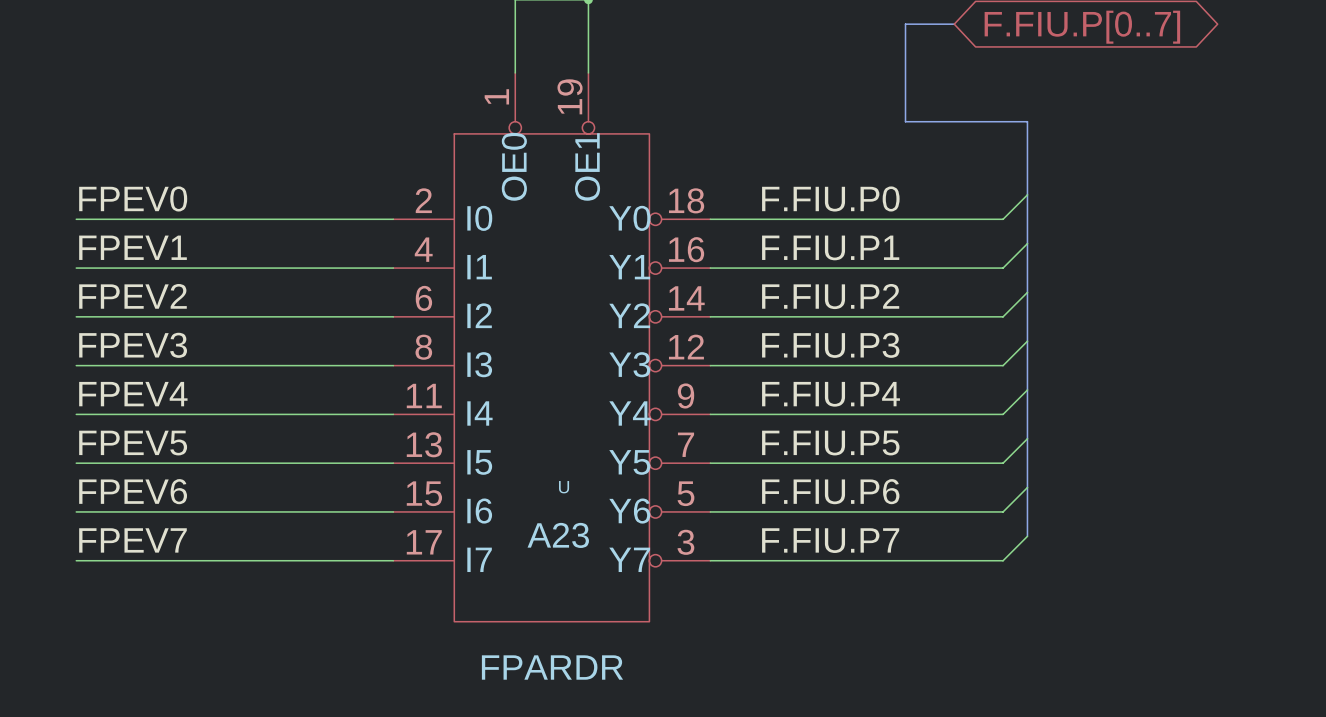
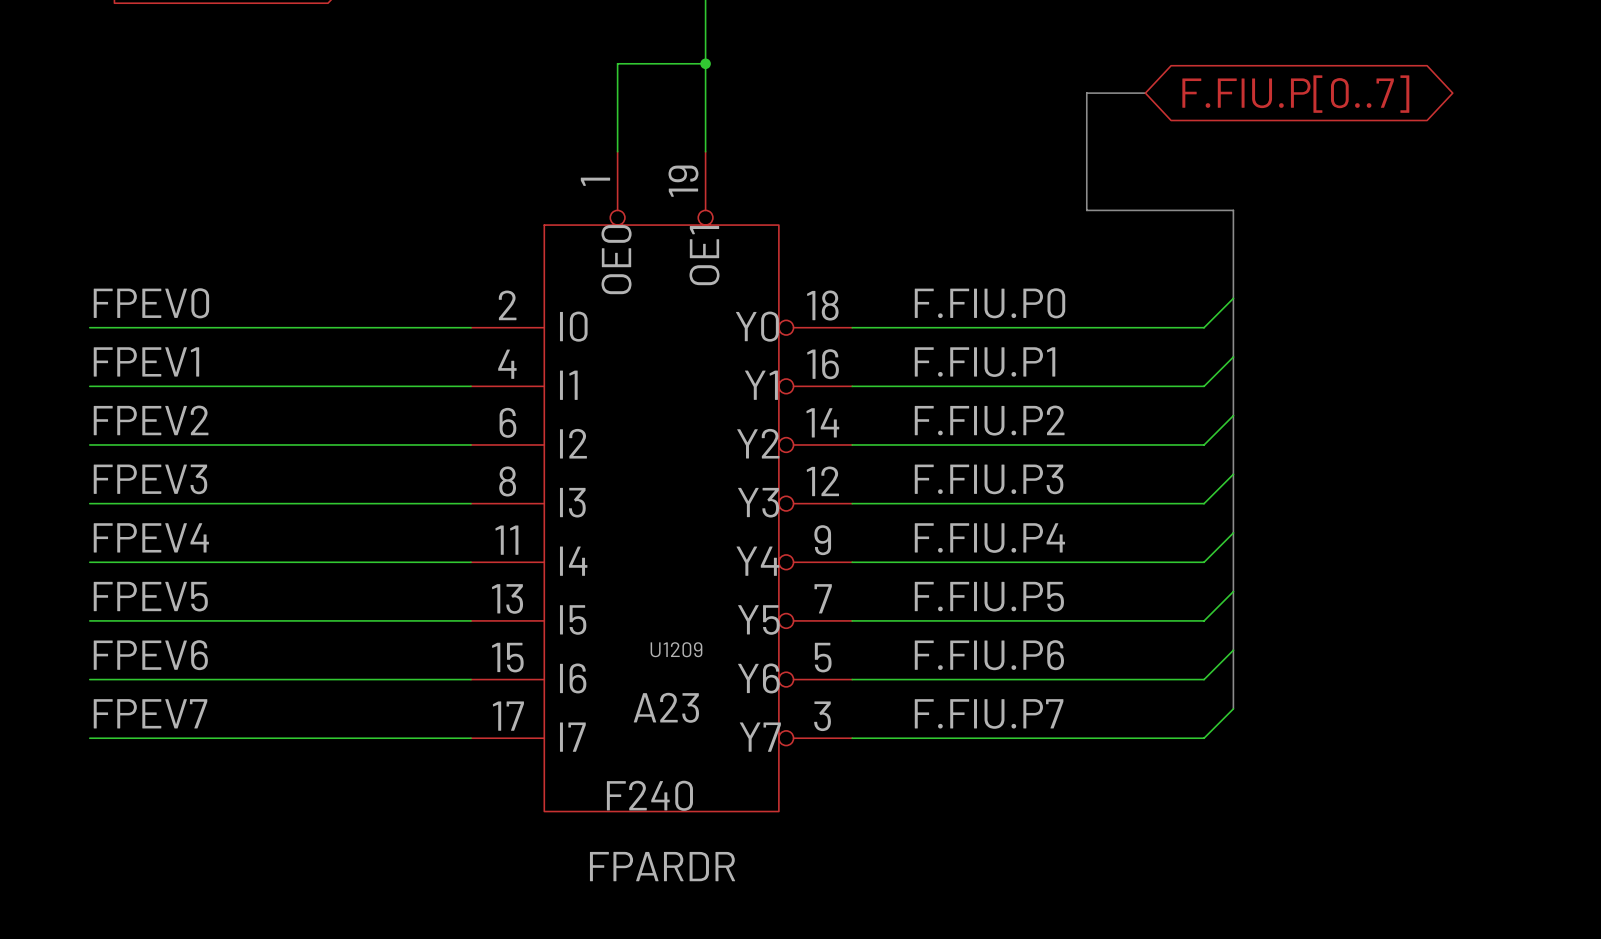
U name: U (564, 487) -> U1209 (676, 649)
U value: none -> F240 (649, 795)

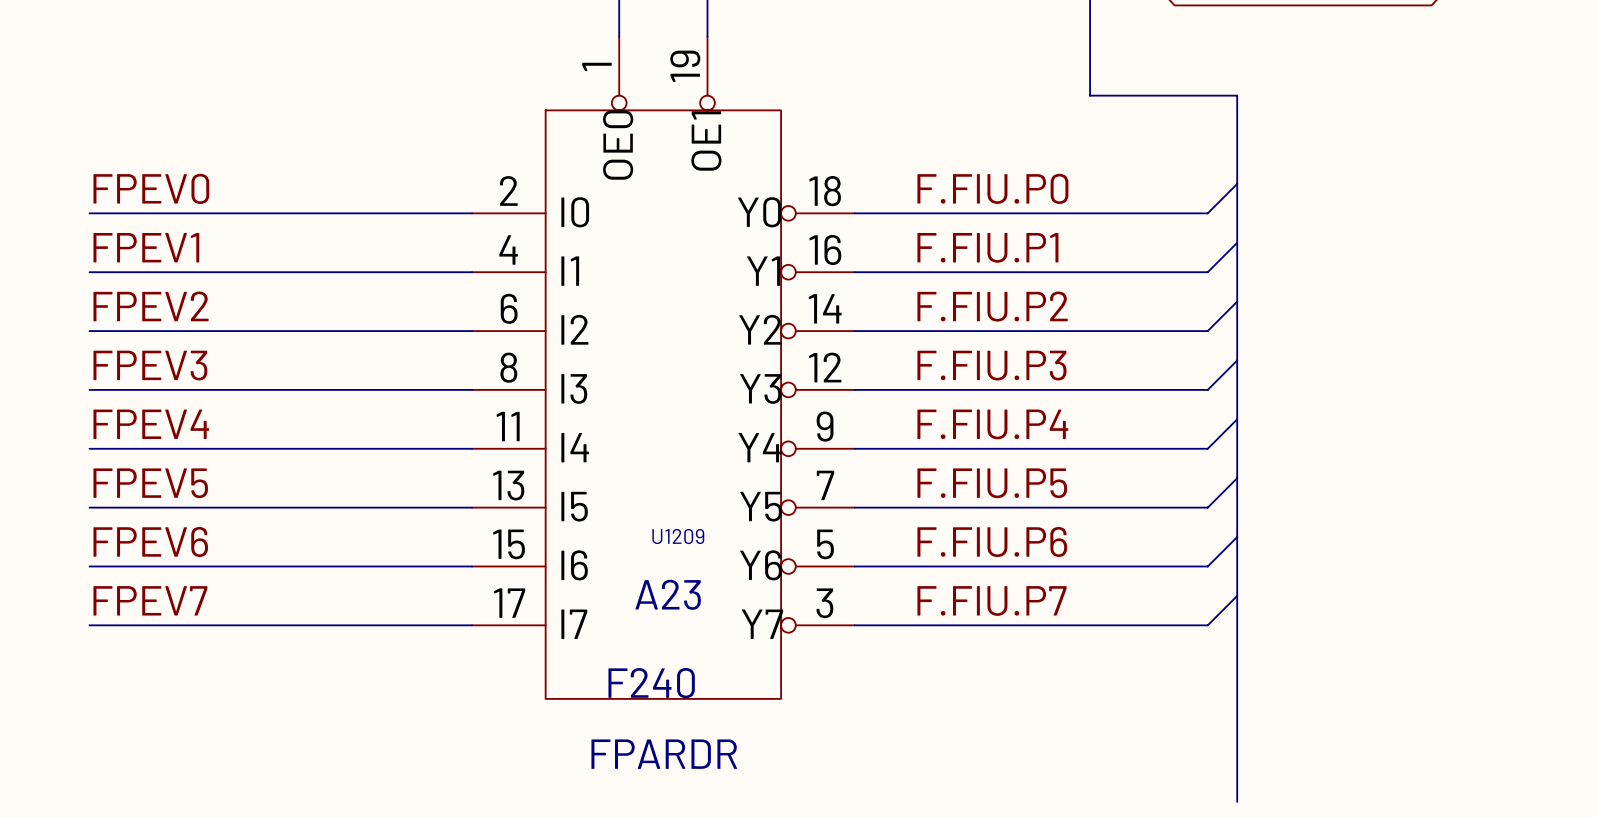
bus: none -> (1237, 595) (1237, 801)

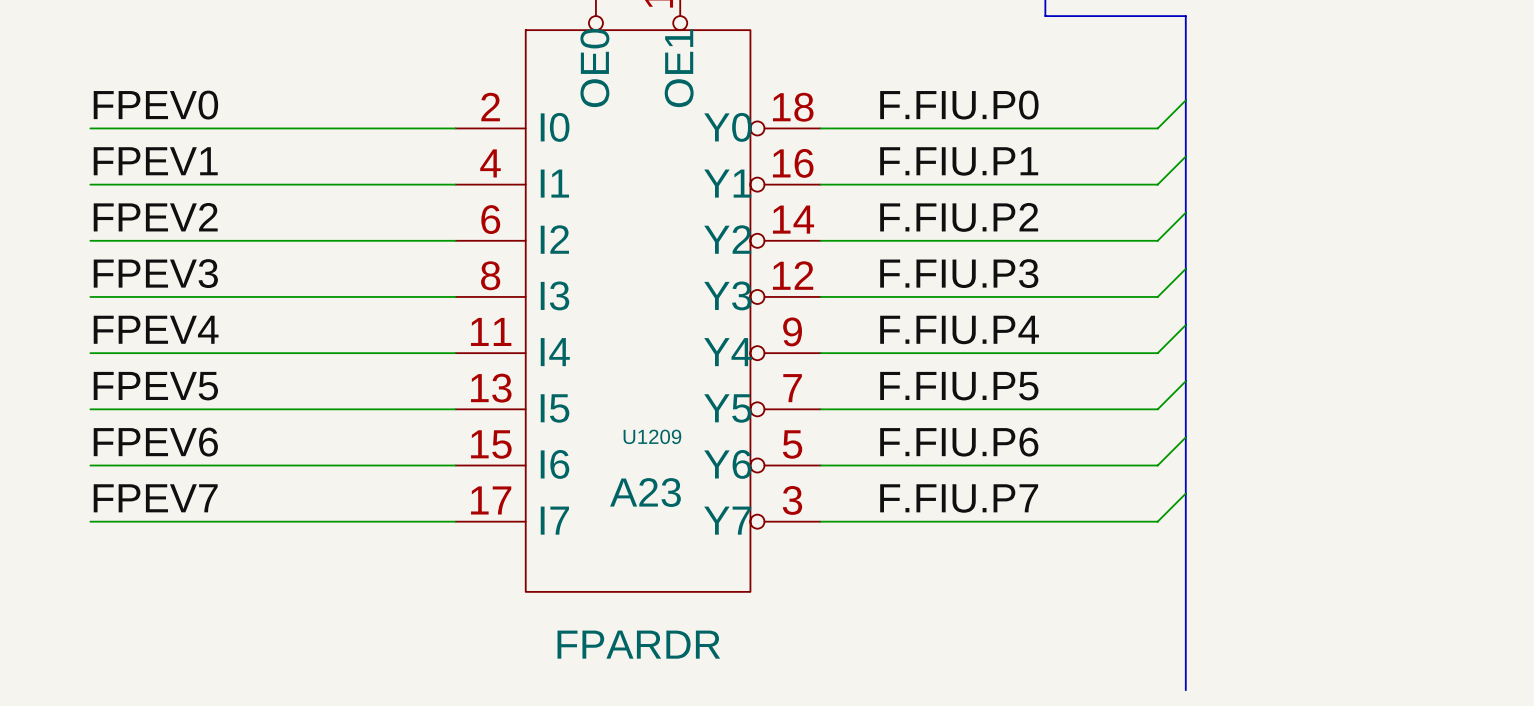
U1209 value: F240 (651, 683) -> none

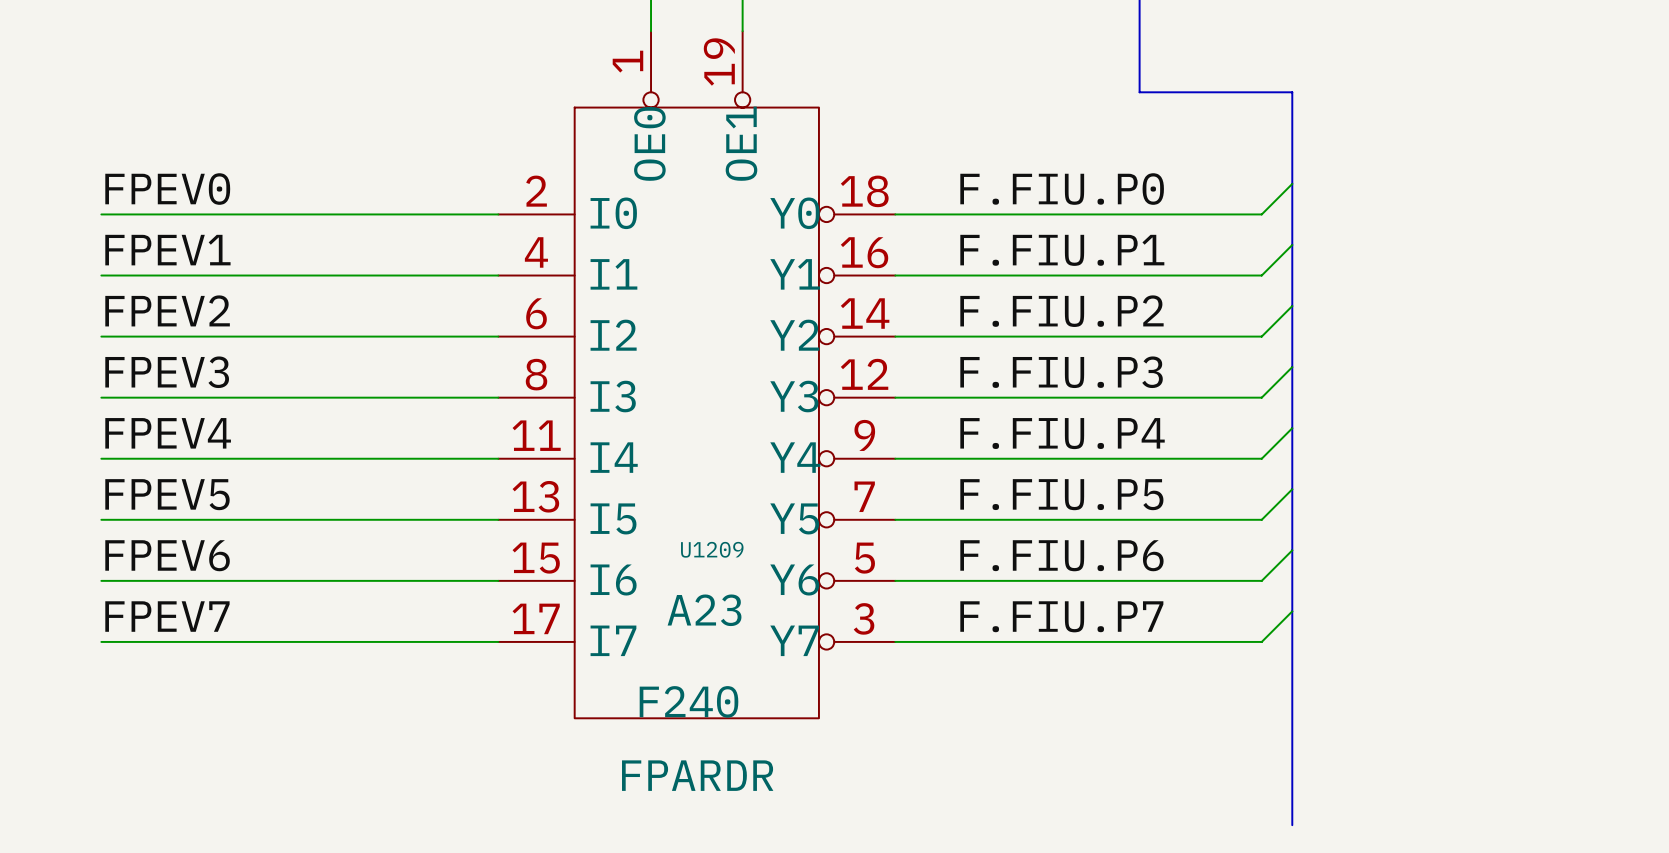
U1209 value: none -> F240 (689, 701)

